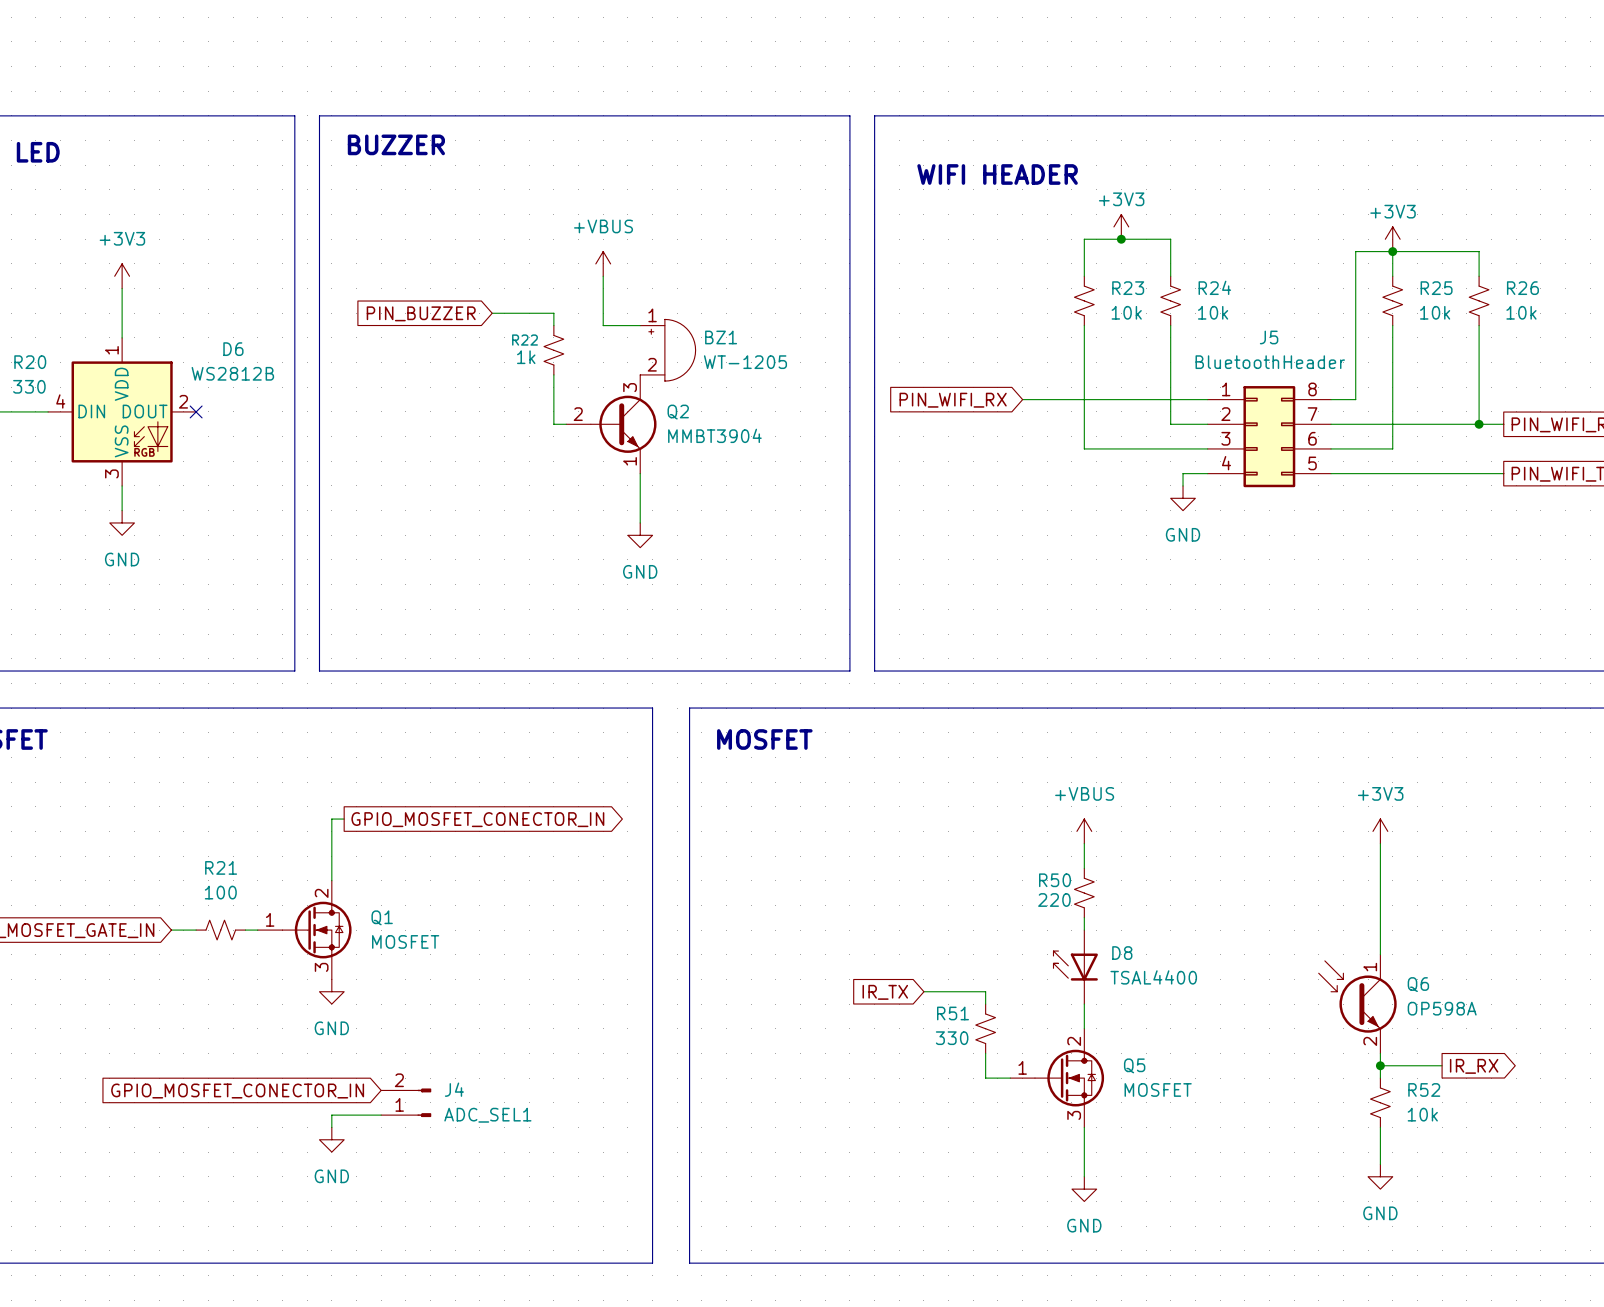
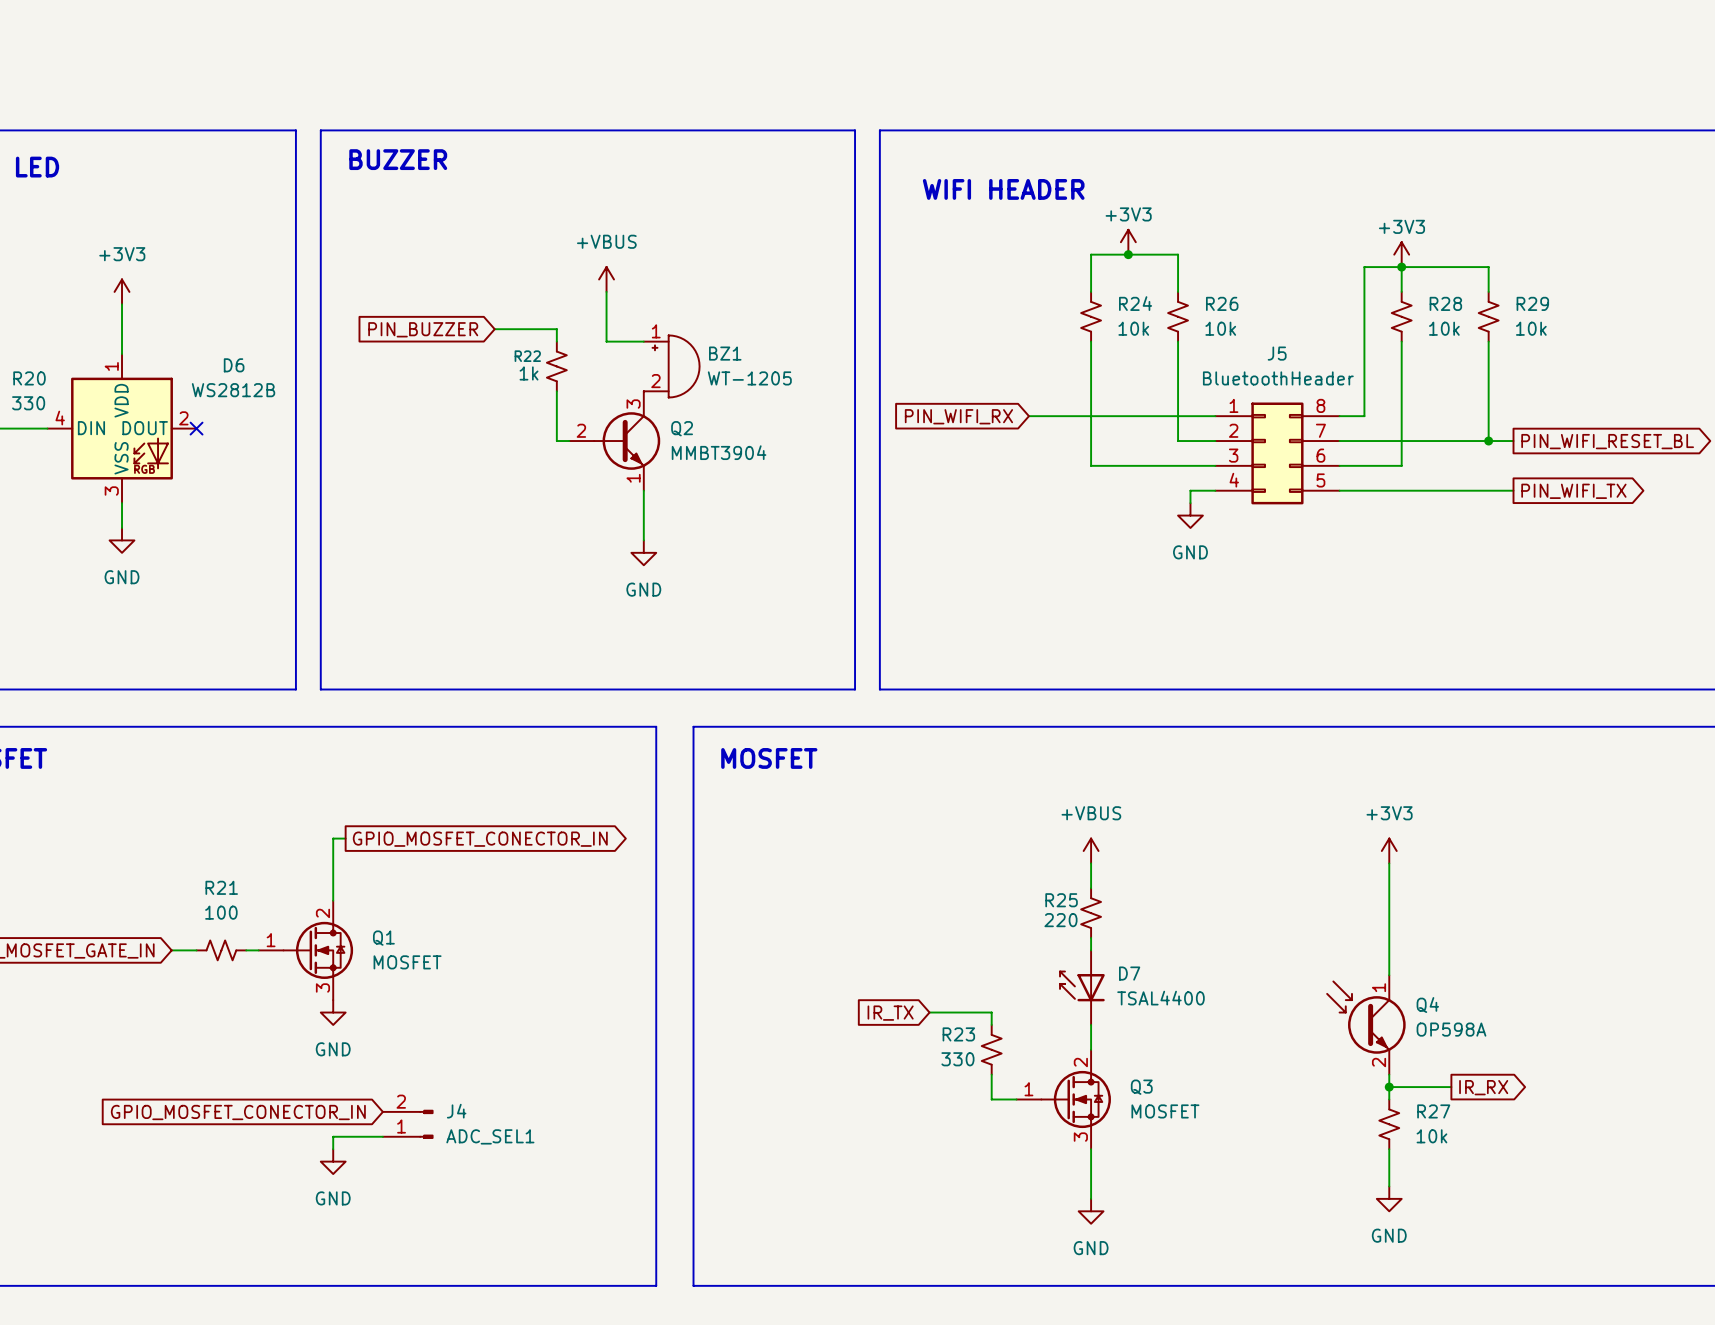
R24 name: R24 (1214, 287) -> R26 (1222, 303)
R23 name: R23 (1128, 288) -> R24 (1135, 303)
R25 name: R25 (1436, 288) -> R28 (1445, 303)
R26 name: R26 (1522, 288) -> R29 (1532, 303)
R50 name: R50 (1055, 880) -> R25 (1061, 900)
D8 name: D8 (1122, 953) -> D7 (1129, 973)
Q6 name: Q6 (1418, 984) -> Q4 (1427, 1005)
R51 name: R51 (953, 1013) -> R23 (958, 1034)
Q5 name: Q5 (1134, 1065) -> Q3 (1141, 1087)
R52 name: R52 (1424, 1089) -> R27 (1433, 1111)

